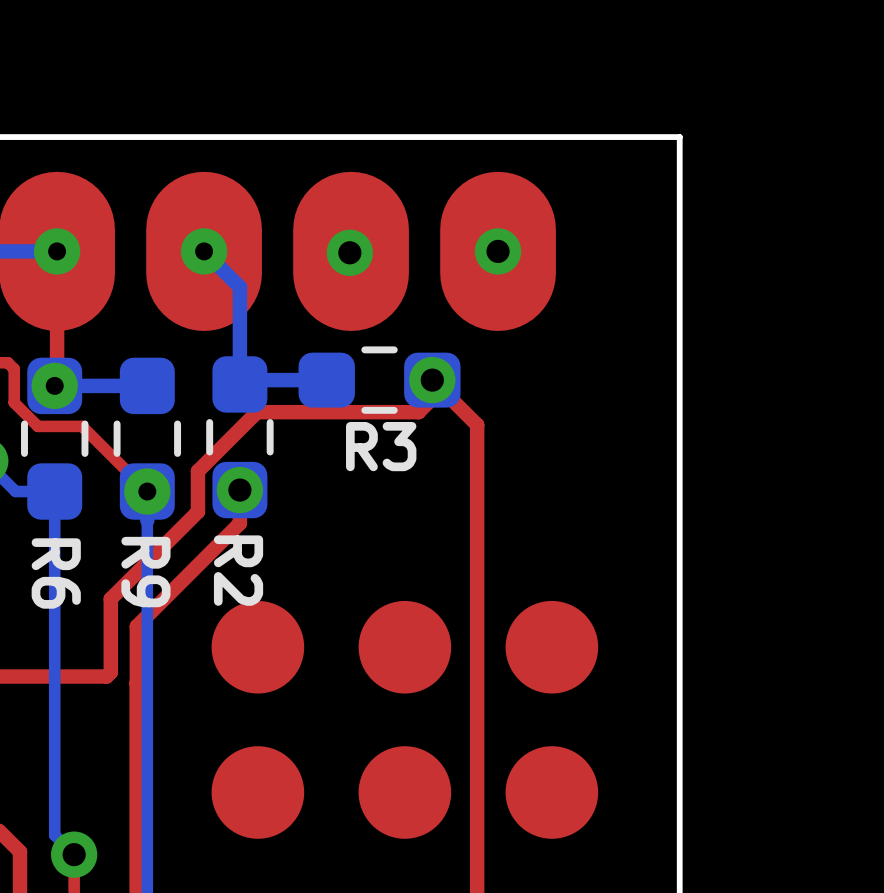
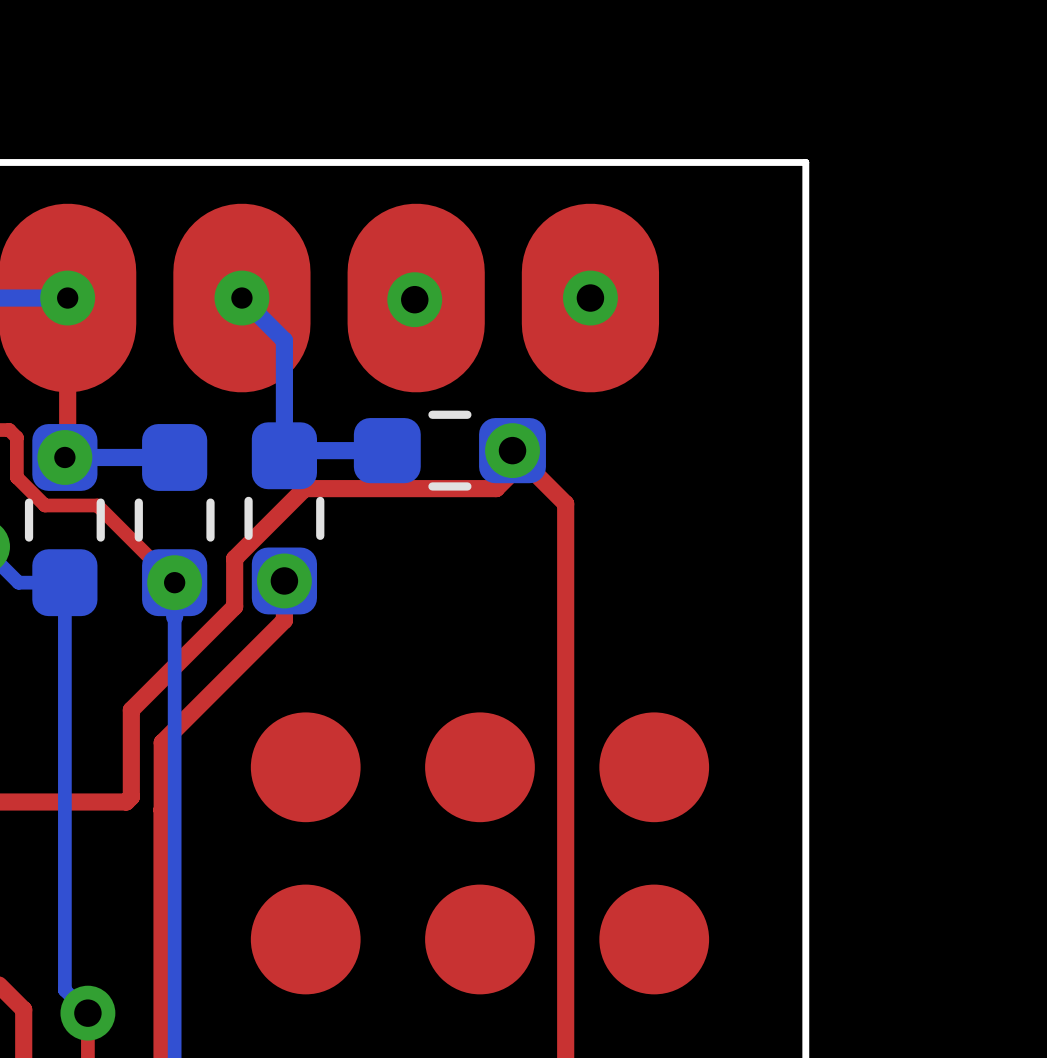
R3 name: R3 (381, 446) -> none
R2 name: R2 (238, 570) -> none
R9 name: R9 (145, 572) -> none
R6 name: R6 (56, 573) -> none

